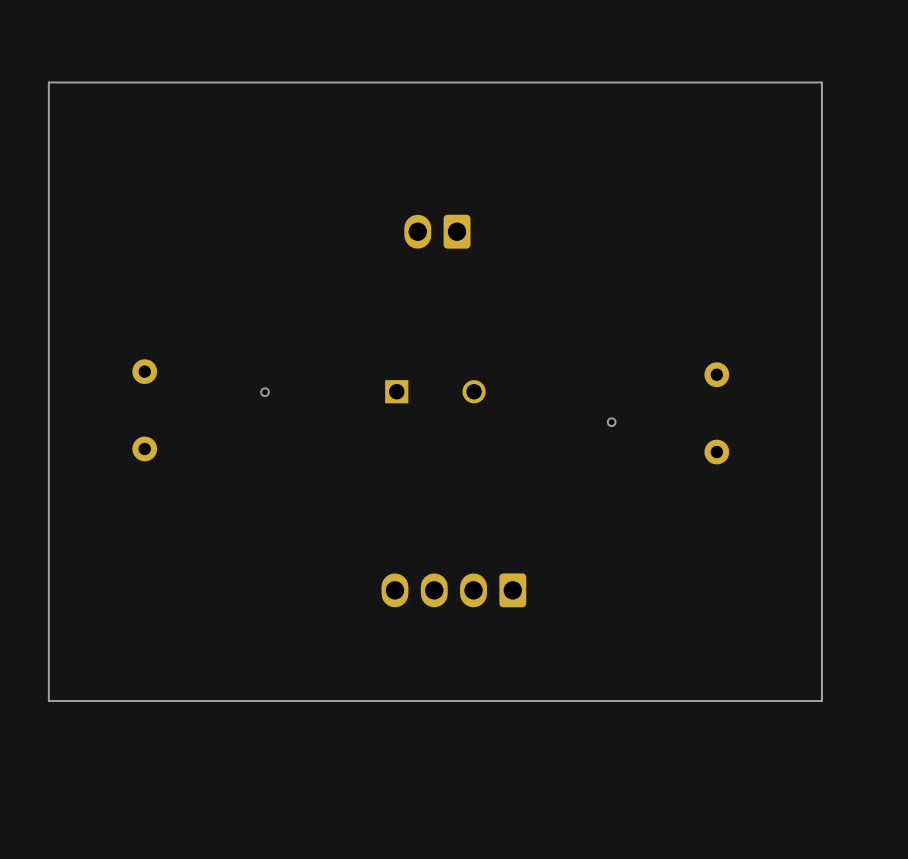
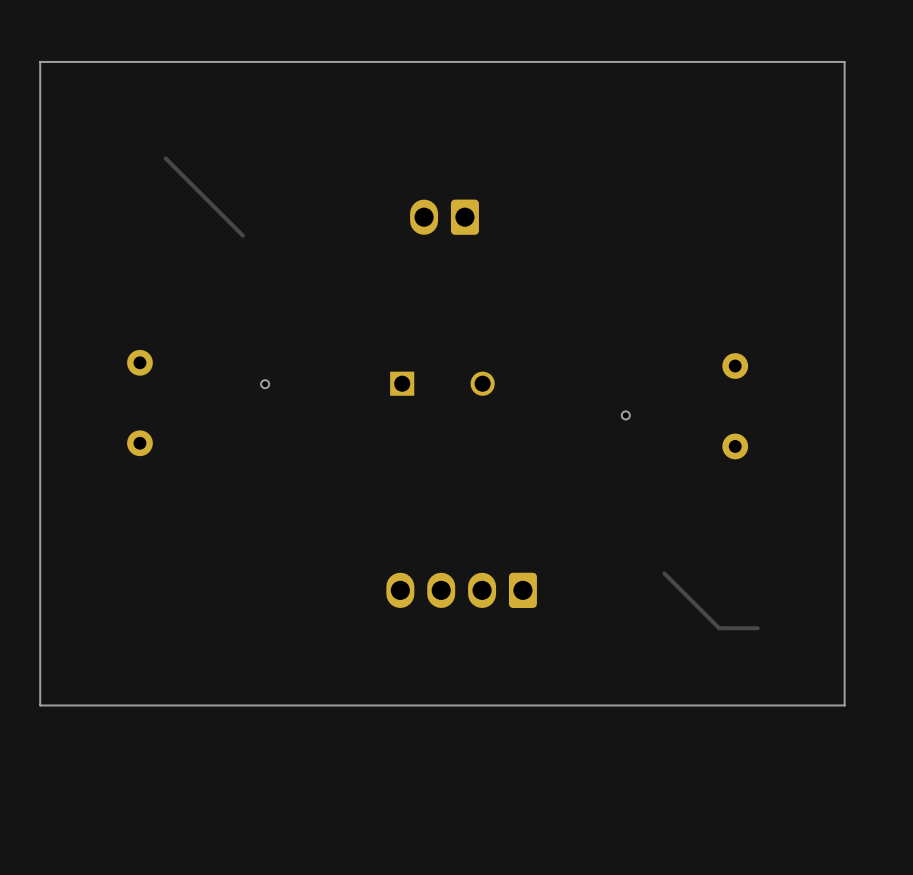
track: none -> (165, 158) (242, 235)
track: none -> (664, 573) (719, 628) (757, 628)

